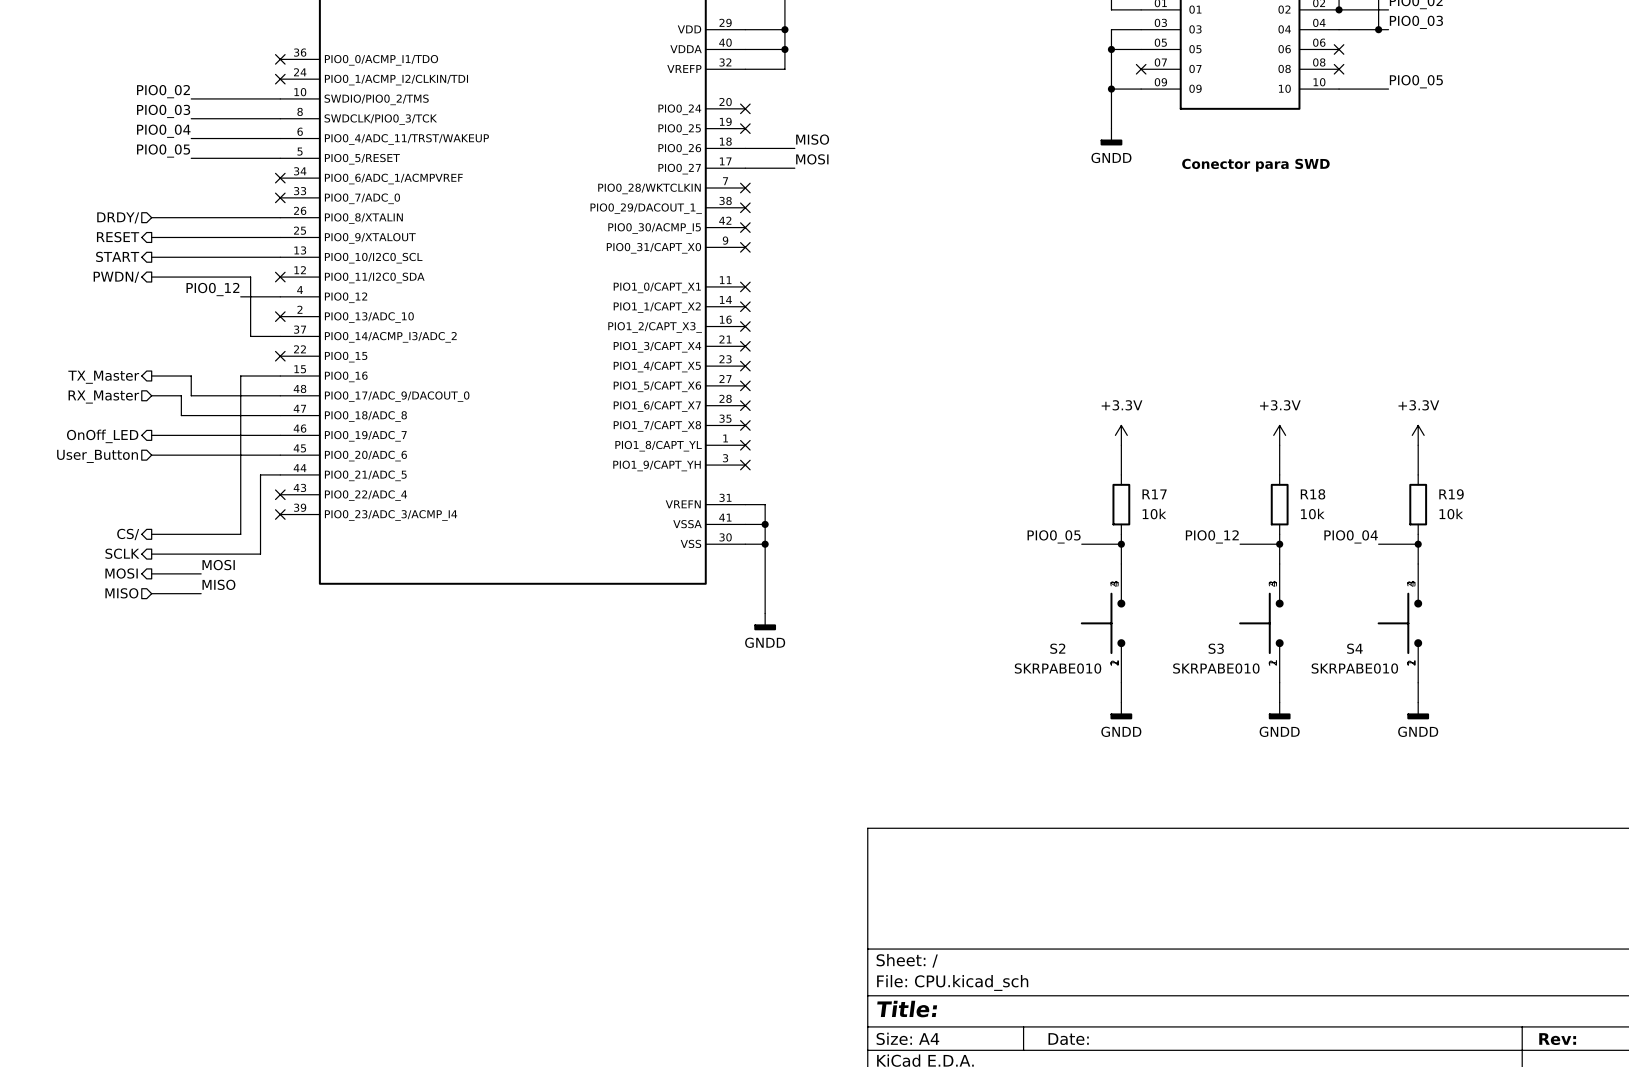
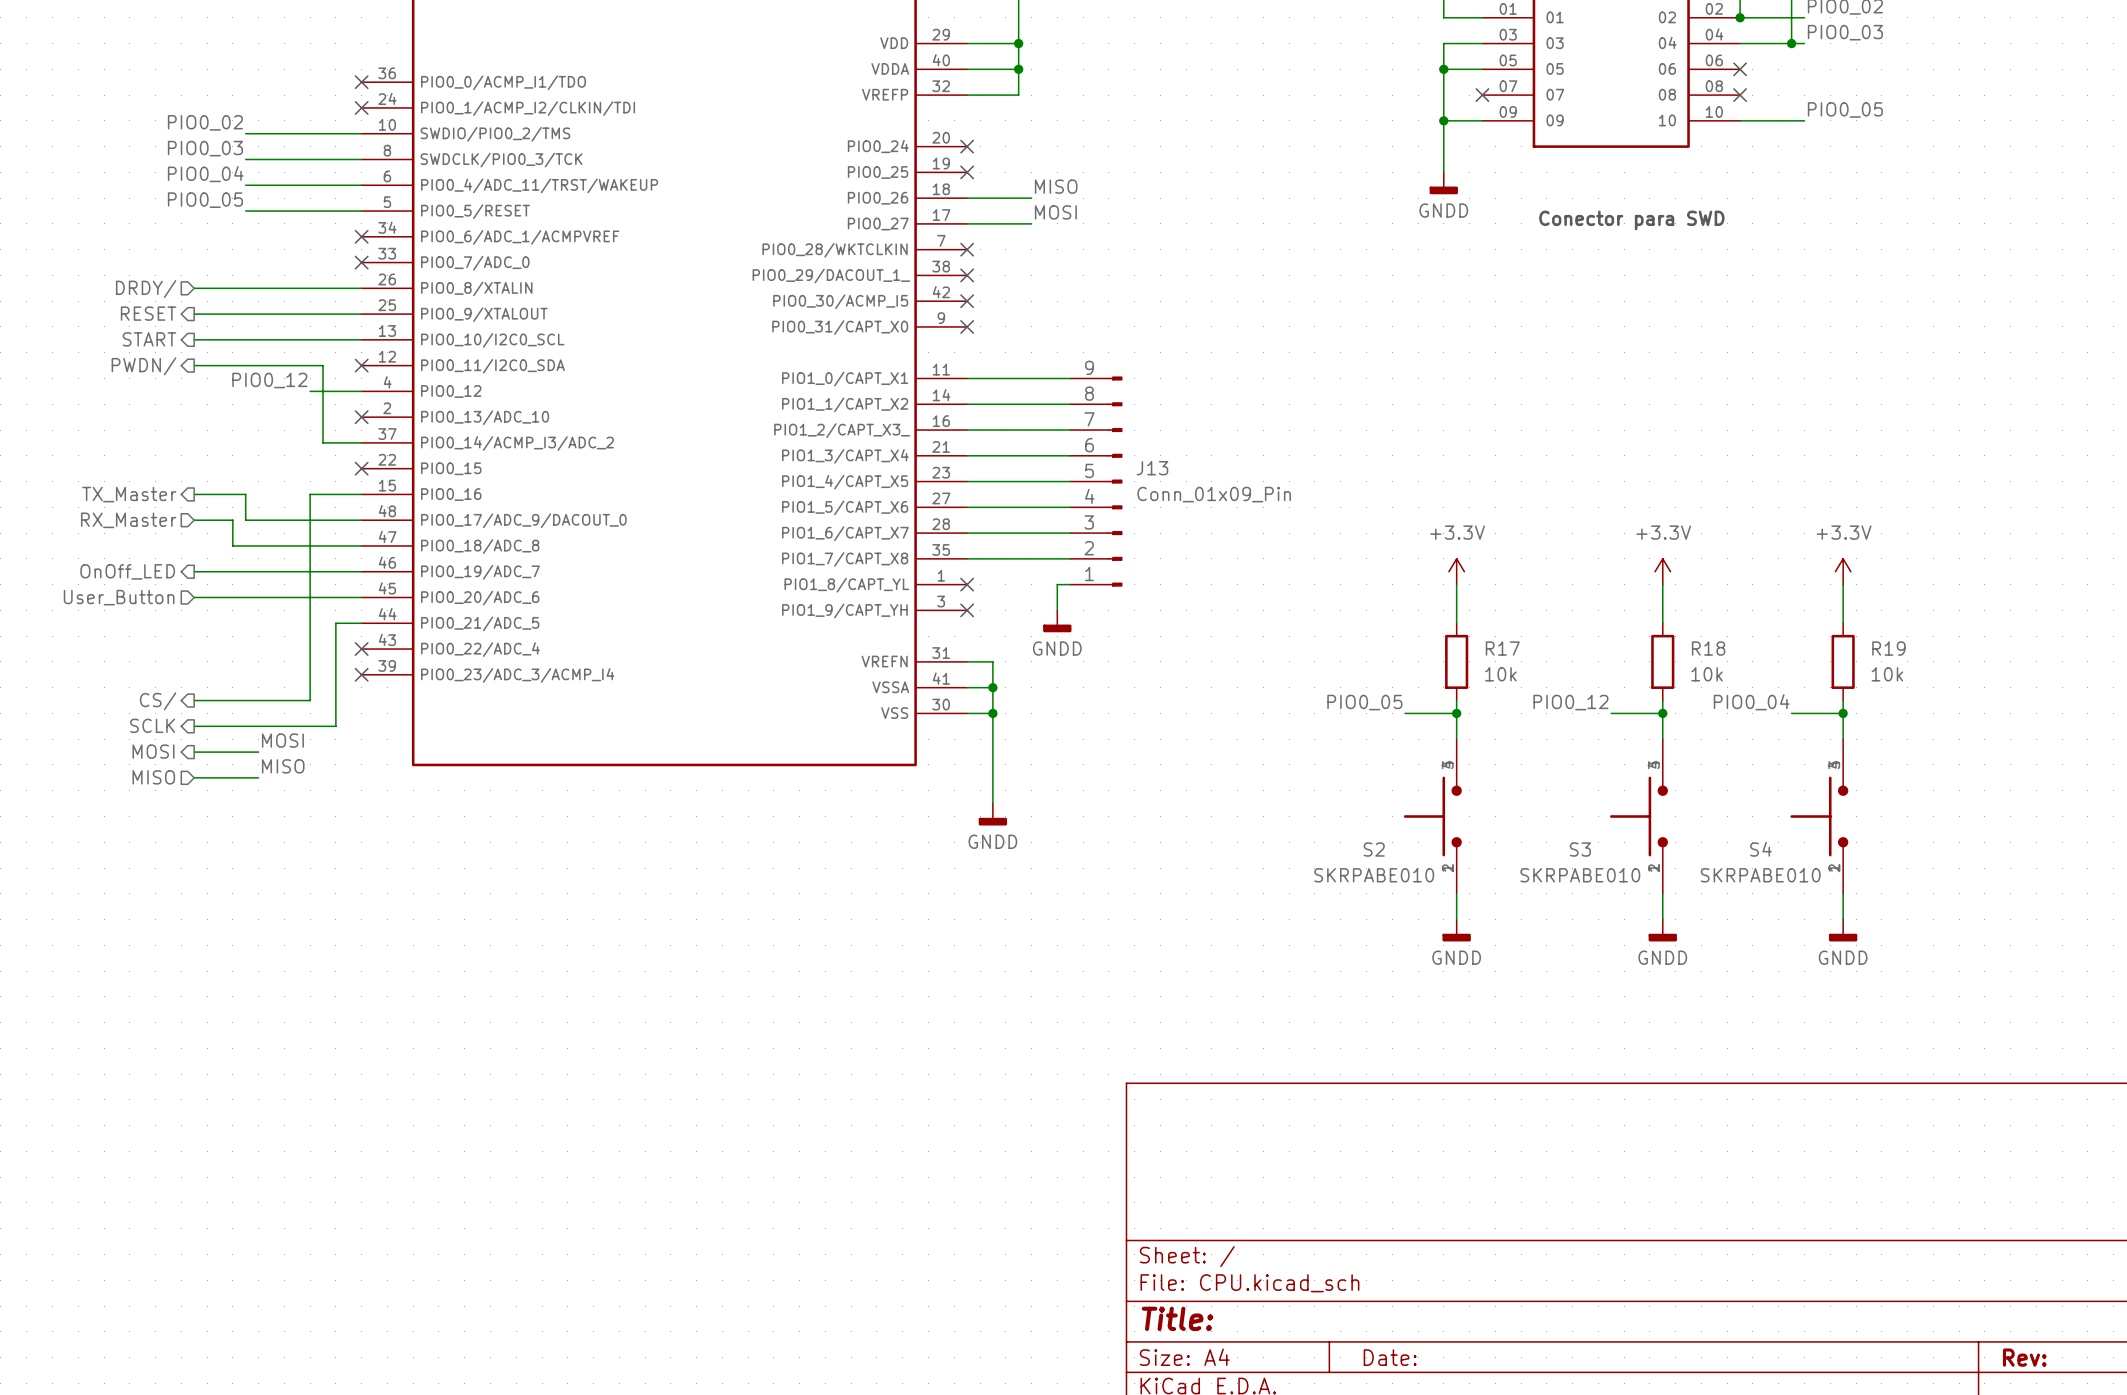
wire: none -> (967, 378) (1070, 378)
no-connect mark: (745, 286) -> none
wire: none -> (967, 404) (1070, 404)
no-connect mark: (745, 306) -> none
wire: none -> (967, 430) (1070, 430)
no-connect mark: (745, 326) -> none
wire: none -> (967, 455) (1070, 455)
no-connect mark: (745, 346) -> none
wire: none -> (967, 481) (1070, 481)
no-connect mark: (745, 366) -> none
J13: none -> Conn_01x09_Pin (1096, 481)
wire: none -> (967, 507) (1070, 507)
no-connect mark: (745, 385) -> none
wire: none -> (967, 533) (1070, 533)
no-connect mark: (745, 405) -> none
wire: none -> (967, 558) (1070, 558)
no-connect mark: (745, 425) -> none
wire: none -> (1070, 584) (1057, 584) (1057, 610)
power symbol: none -> GNDD (1057, 621)

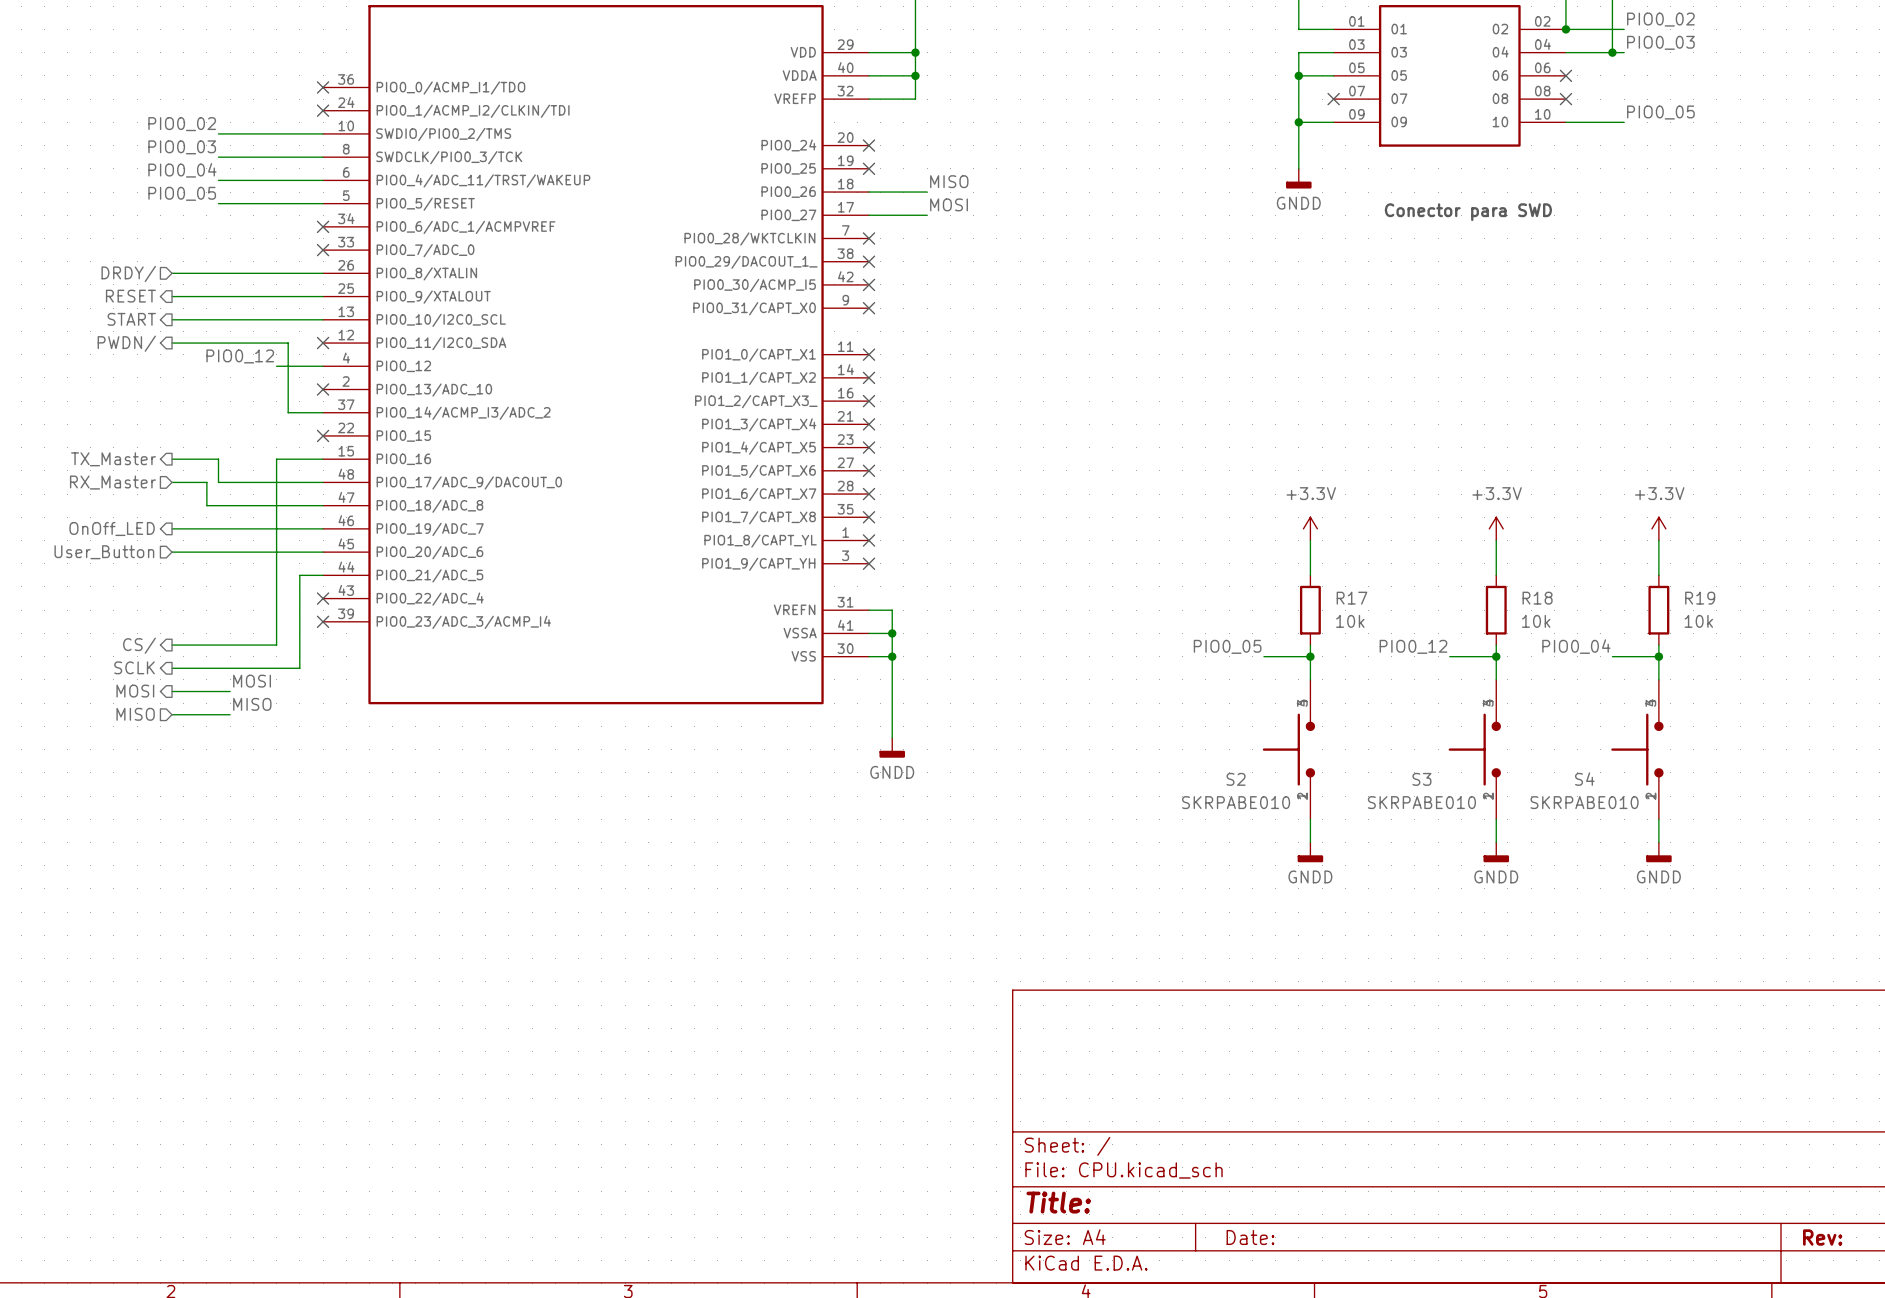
wire: (967, 378) (1070, 378) -> none
no-connect mark: none -> (869, 354)
wire: (967, 404) (1070, 404) -> none
no-connect mark: none -> (869, 377)
wire: (967, 430) (1070, 430) -> none
no-connect mark: none -> (869, 401)
wire: (967, 455) (1070, 455) -> none
no-connect mark: none -> (869, 424)
wire: (967, 481) (1070, 481) -> none
no-connect mark: none -> (869, 447)
J13: Conn_01x09_Pin (1096, 481) -> none
wire: (967, 507) (1070, 507) -> none
no-connect mark: none -> (869, 470)
wire: (967, 533) (1070, 533) -> none
no-connect mark: none -> (869, 494)
wire: (967, 558) (1070, 558) -> none
no-connect mark: none -> (869, 517)
wire: (1070, 584) (1057, 584) (1057, 610) -> none
power symbol: GNDD (1057, 621) -> none

